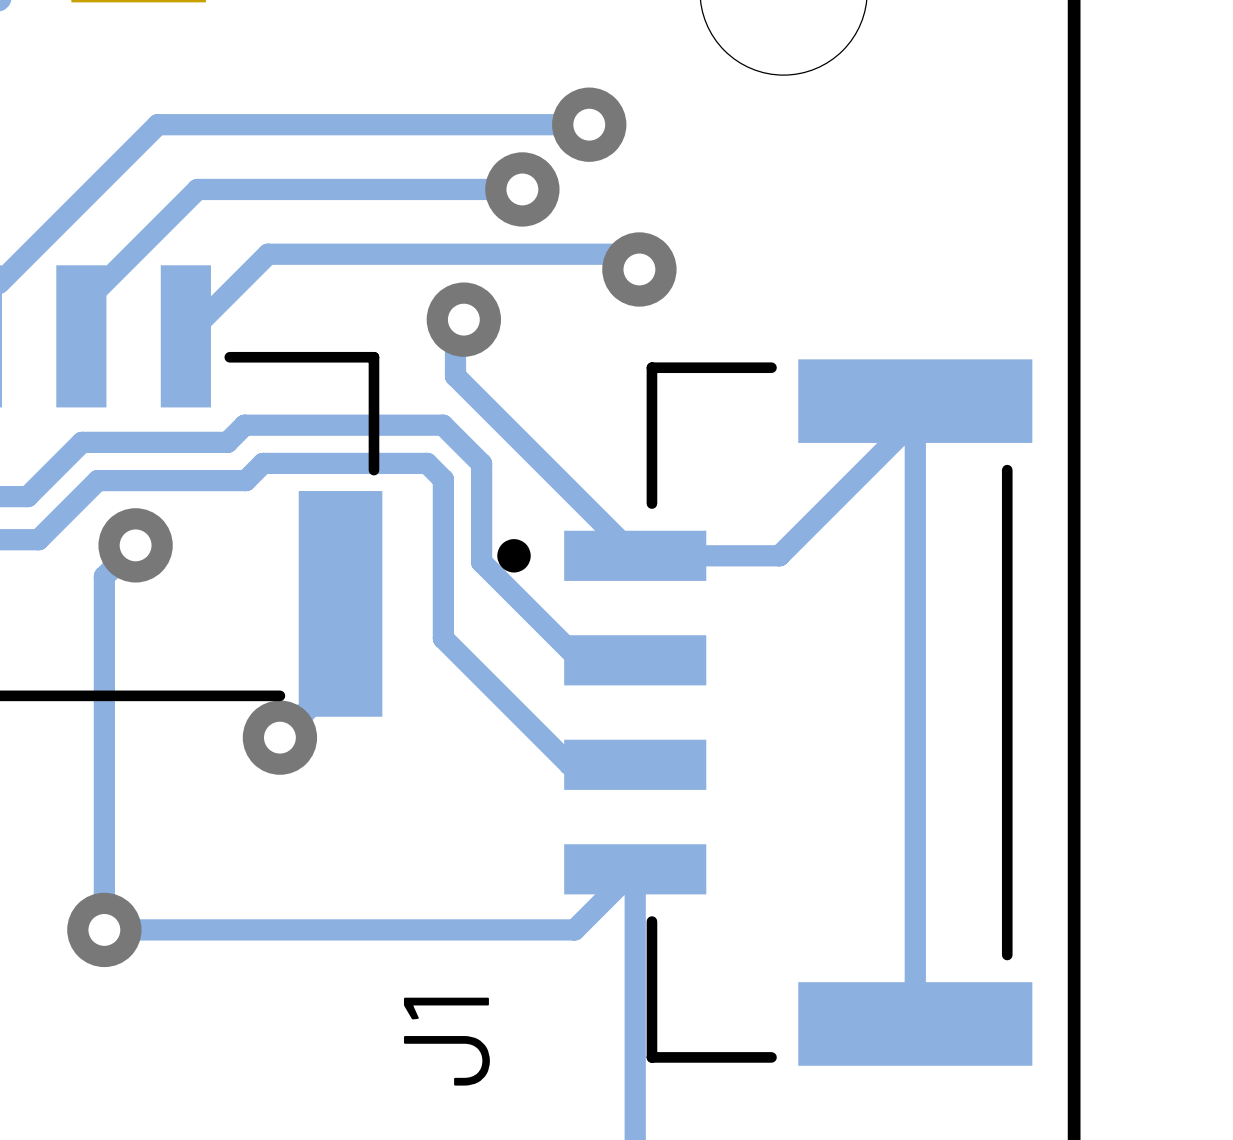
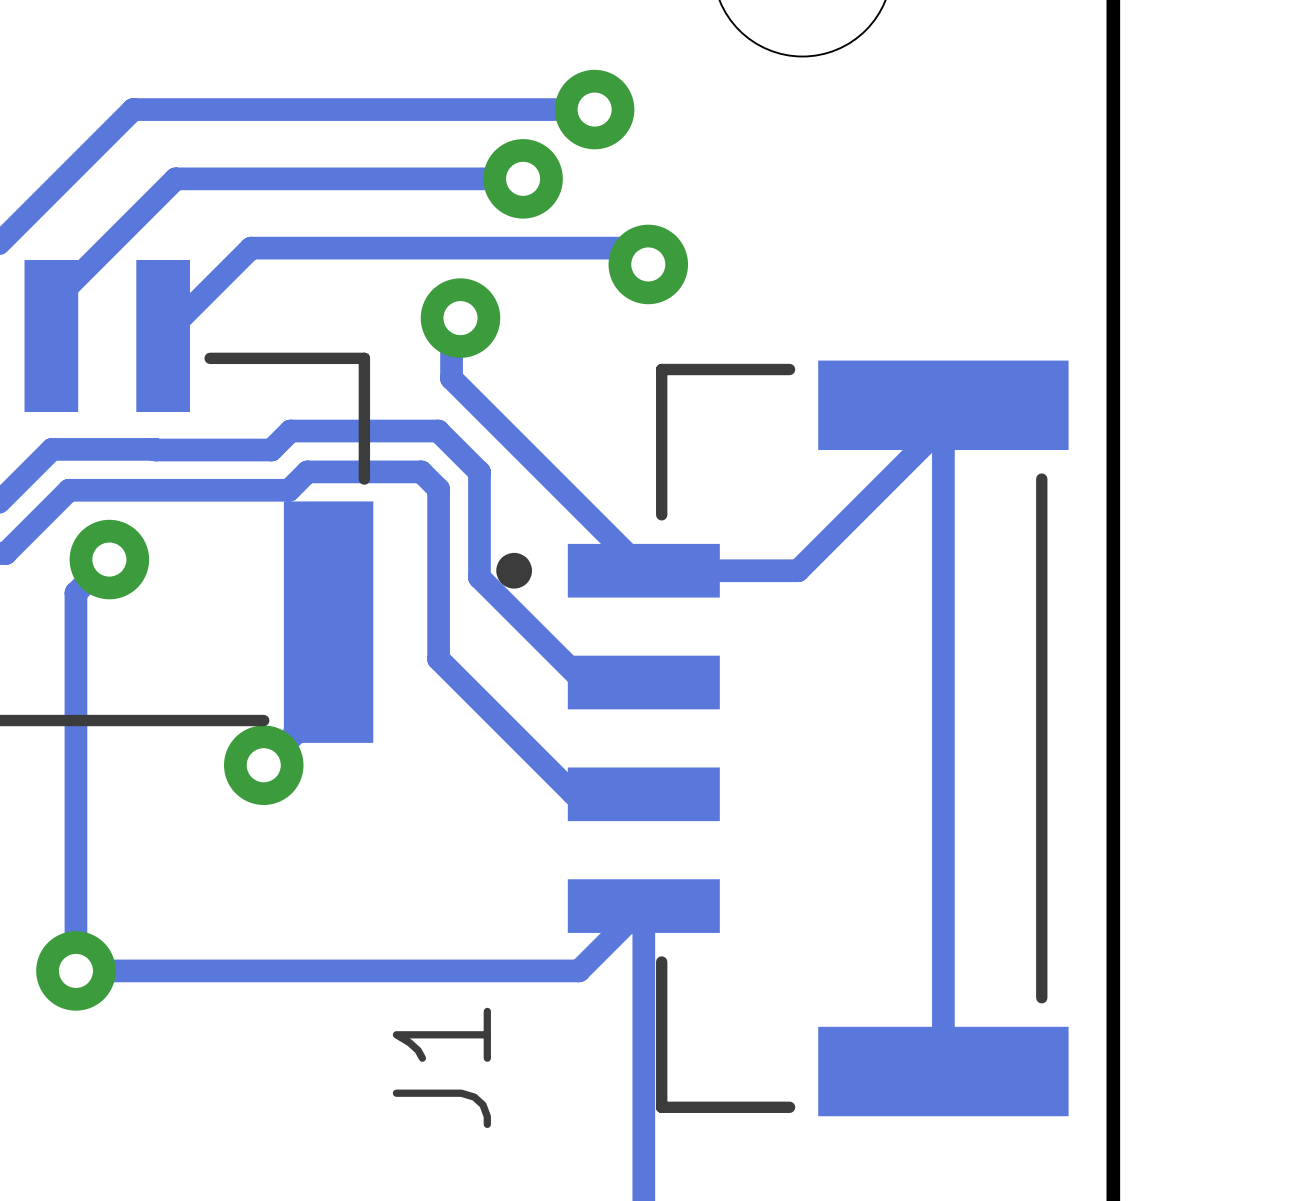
track: (304, 425) (244, 425) (227, 442) (178, 442) -> (290, 431) (271, 450) (155, 450)
track: (320, 463) (263, 463) (245, 480) -> (307, 471) (289, 490) (227, 490)

